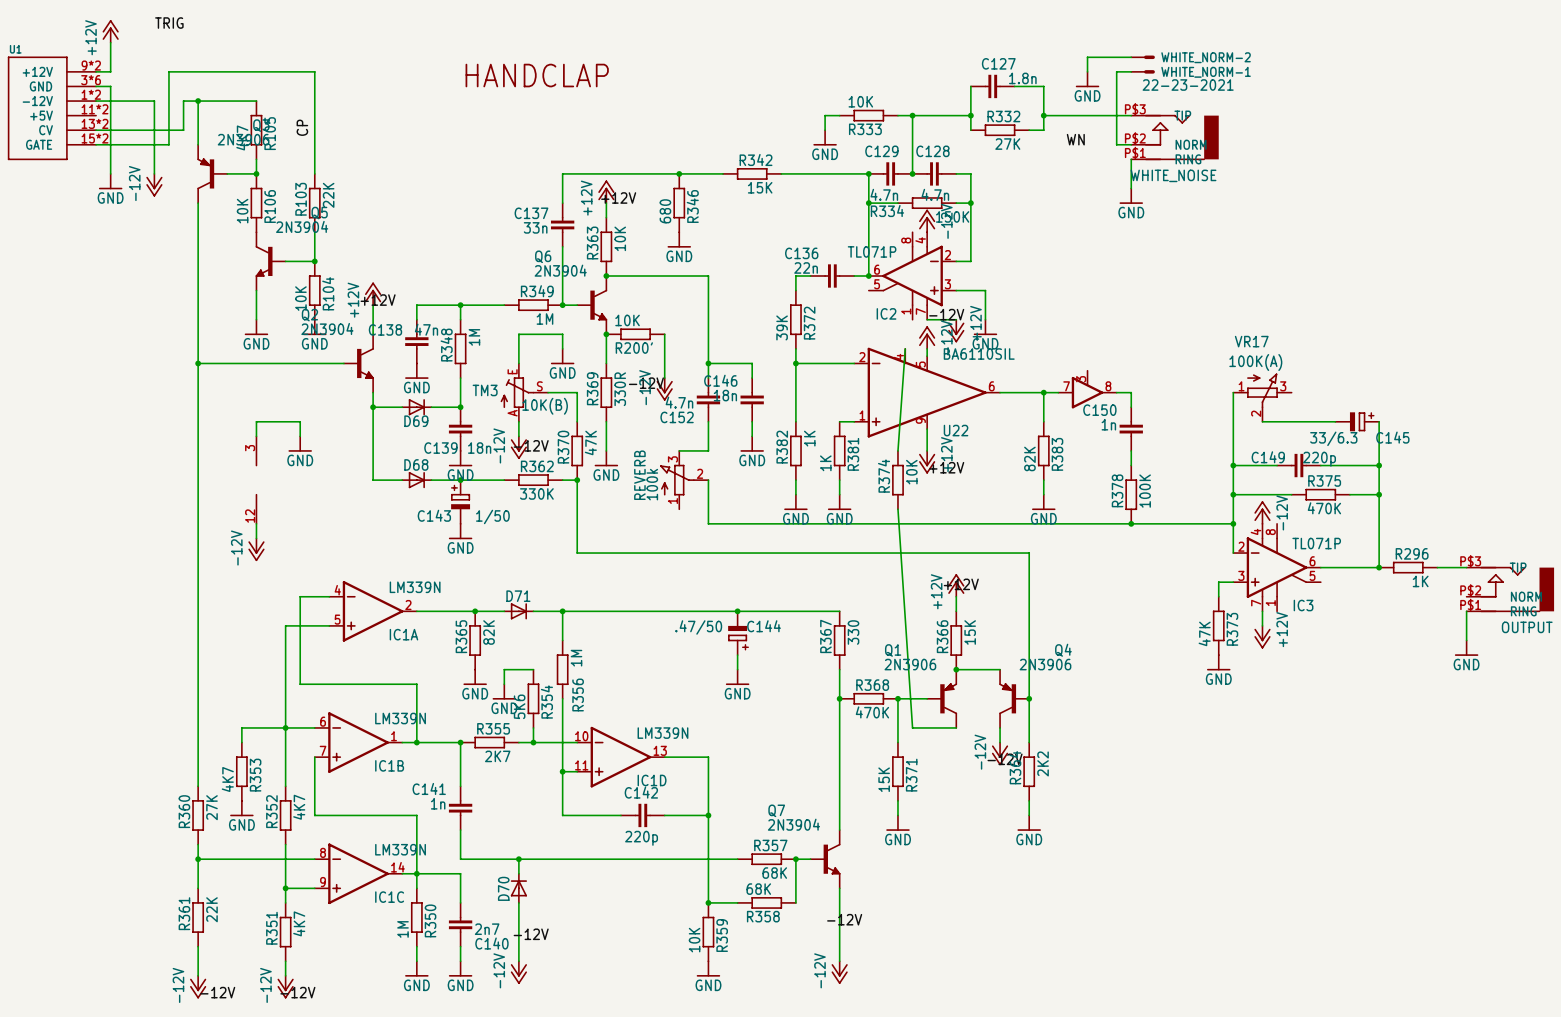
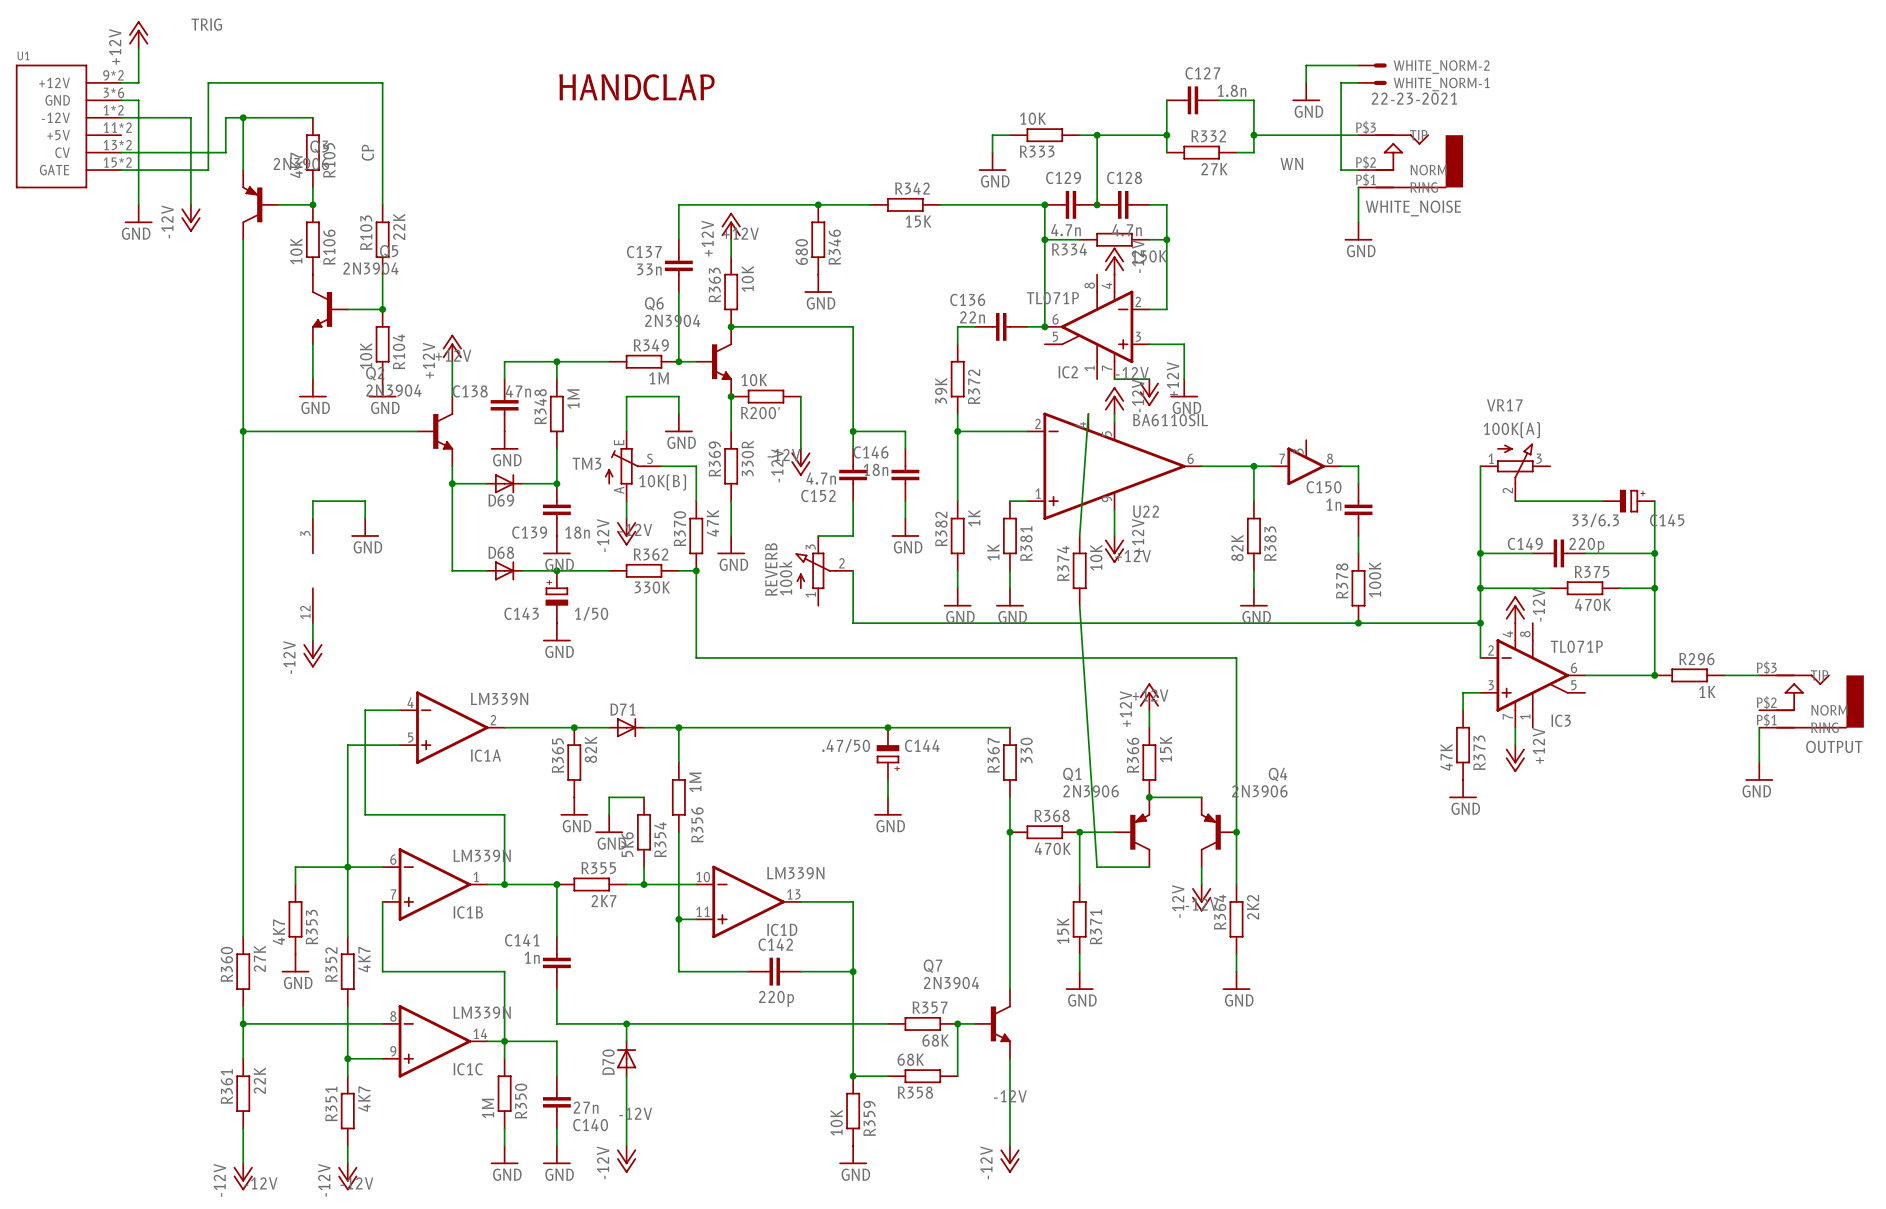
C140 value: 2n7 (487, 929) -> 27n (586, 1107)

